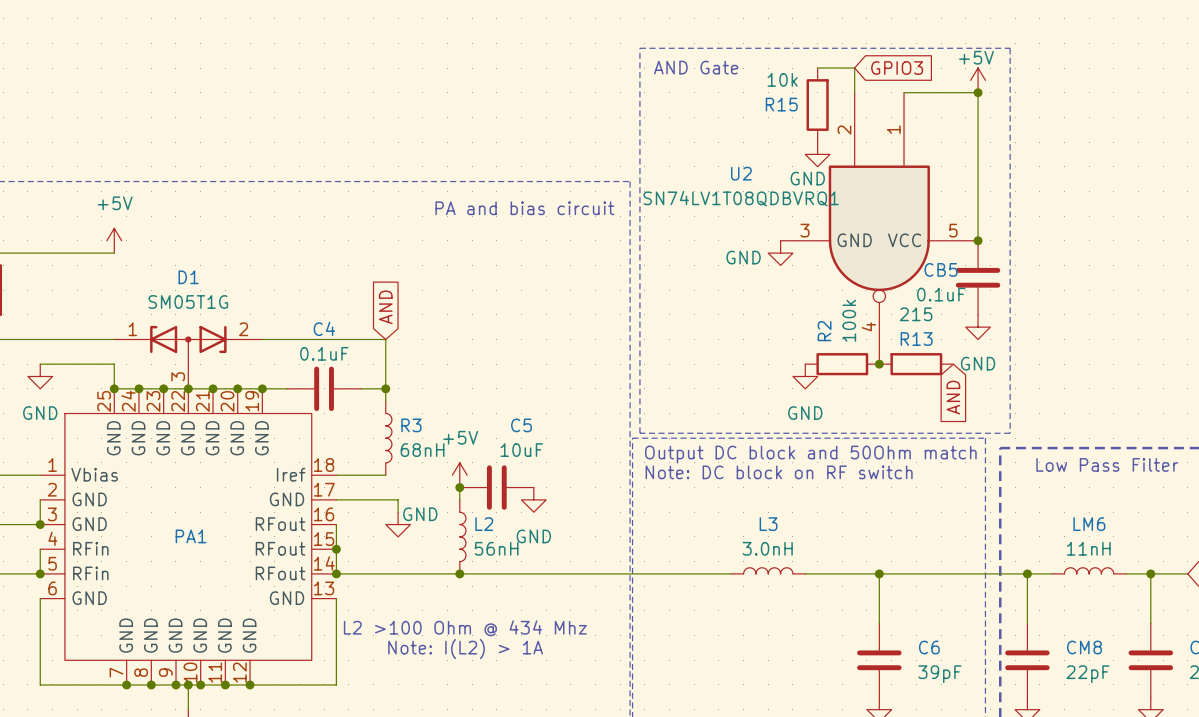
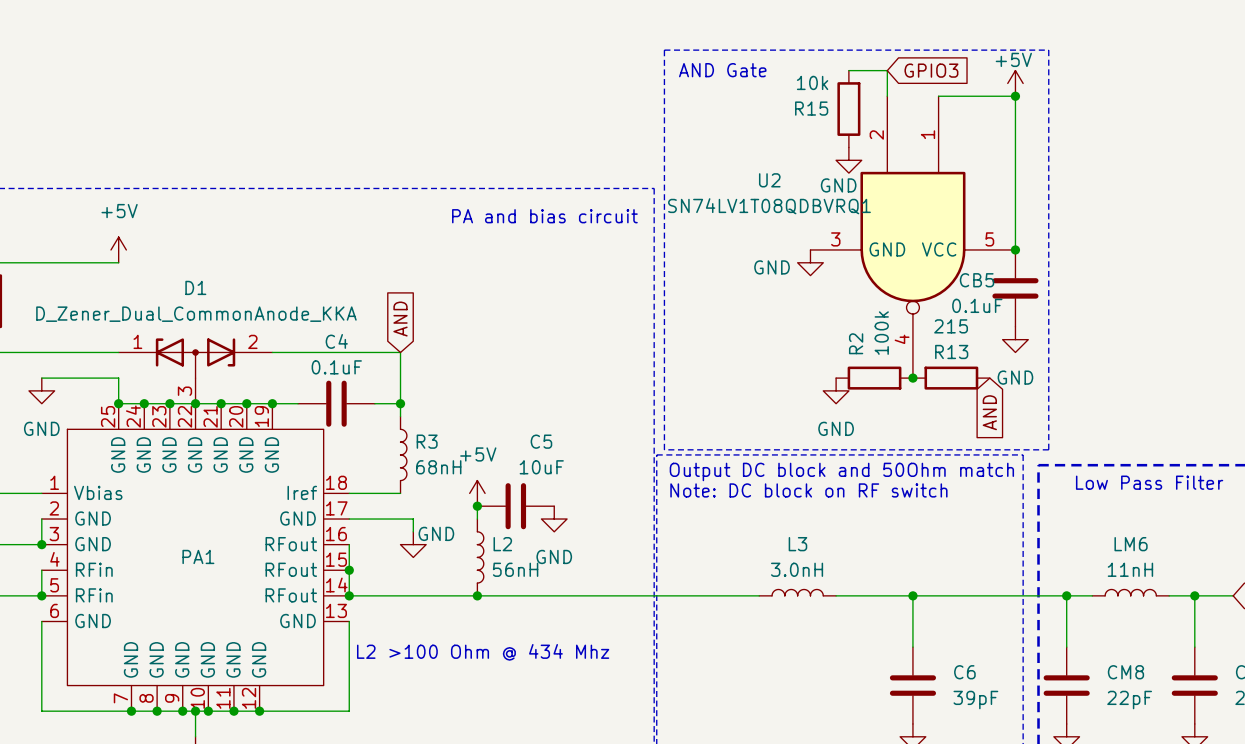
D1 value: SM05T1G (188, 302) -> D_Zener_Dual_CommonAnode_KKA (196, 314)
text: Note: I(L2) > 1A (465, 649) -> none

